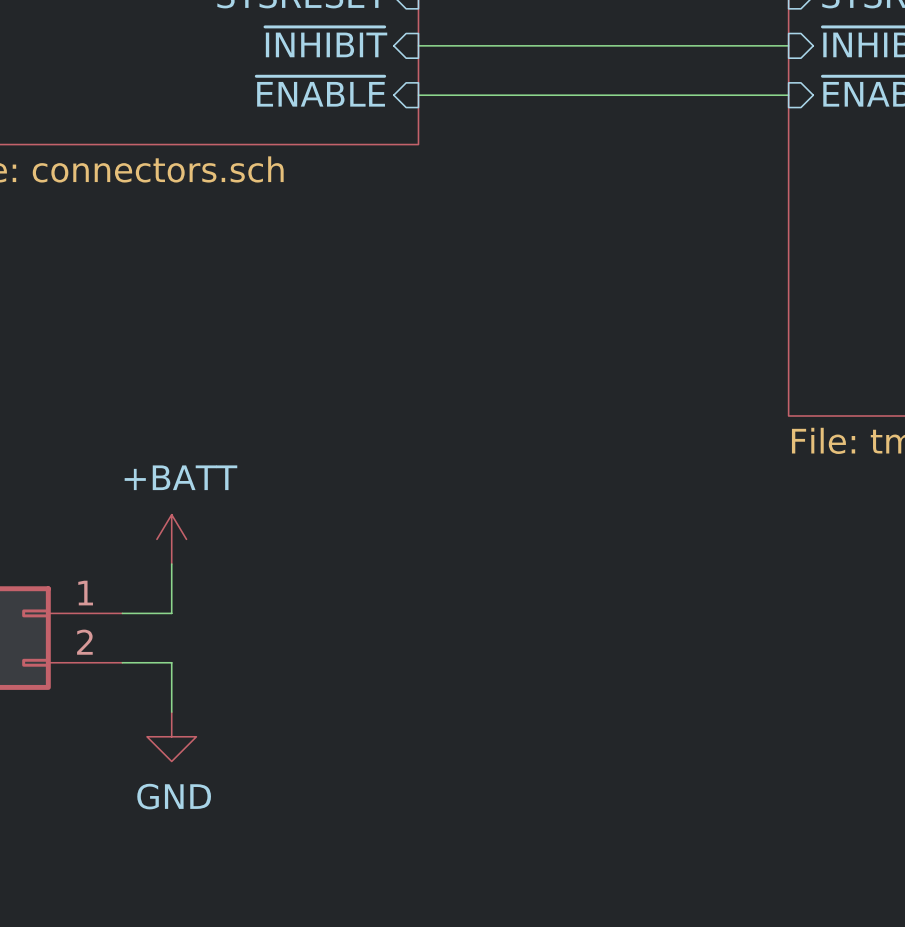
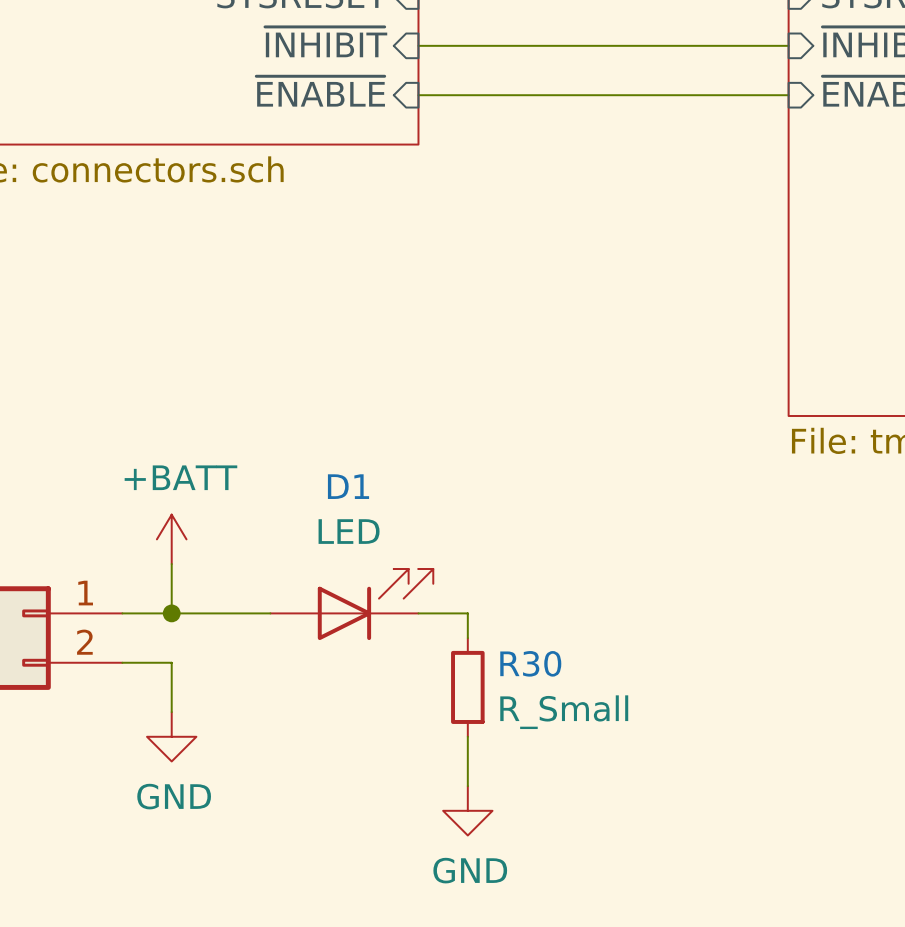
D1: none -> LED (351, 604)
wire: none -> (171, 613) (270, 613)
junction: none -> (171, 613)
wire: none -> (418, 613) (467, 613) (467, 638)
R30: none -> R_Small (467, 687)
wire: none -> (467, 736) (467, 786)
power symbol: none -> GND (467, 810)

